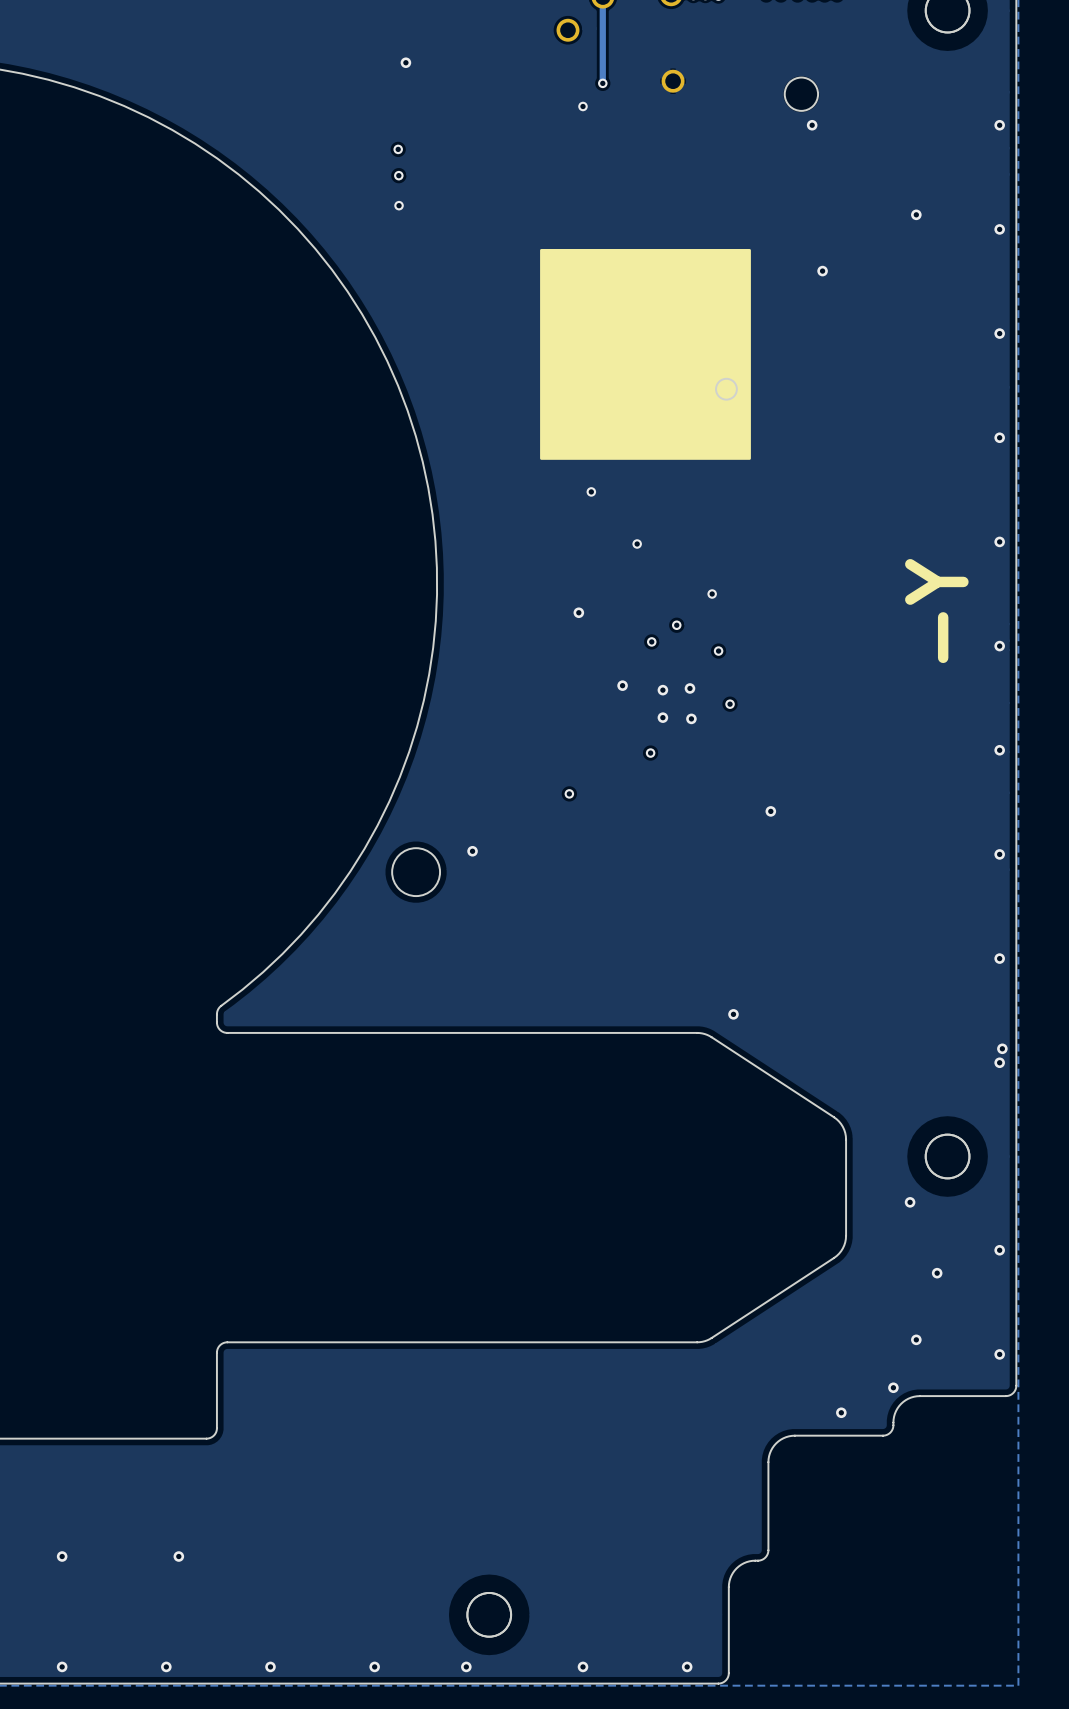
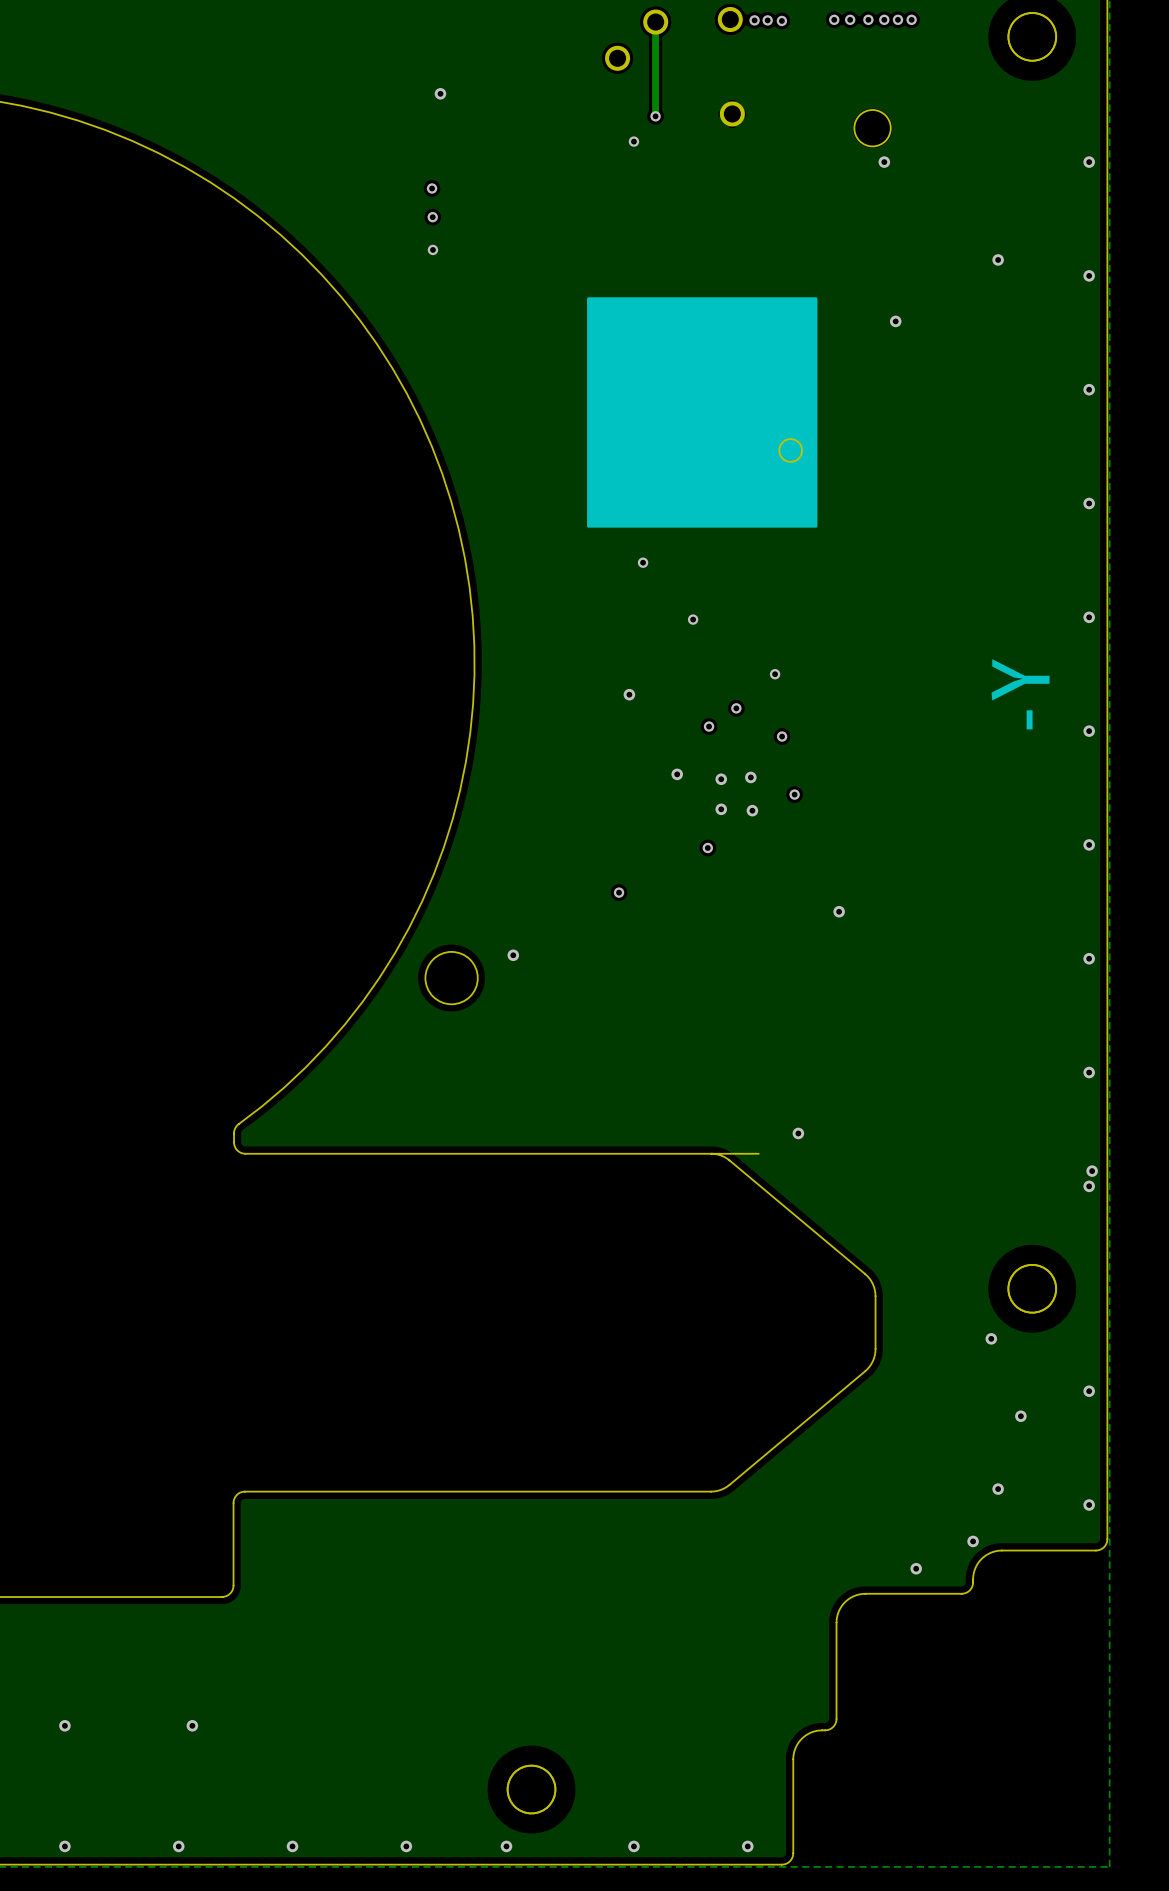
board edge: (697, 1032) (711, 1037) (834, 1117) (841, 1124) (846, 1139) (846, 1235) (842, 1248) (836, 1255) (711, 1338) (699, 1342) (224, 1342) (219, 1346) (217, 1351) (216, 1429) (213, 1435) (206, 1438) -> (711, 1153) (720, 1155) (729, 1160) (869, 1278) (875, 1293) (875, 1348) (872, 1361) (865, 1371) (729, 1484) (717, 1490) (241, 1492) (235, 1495) (233, 1501) (233, 1587) (230, 1593) (222, 1596)

